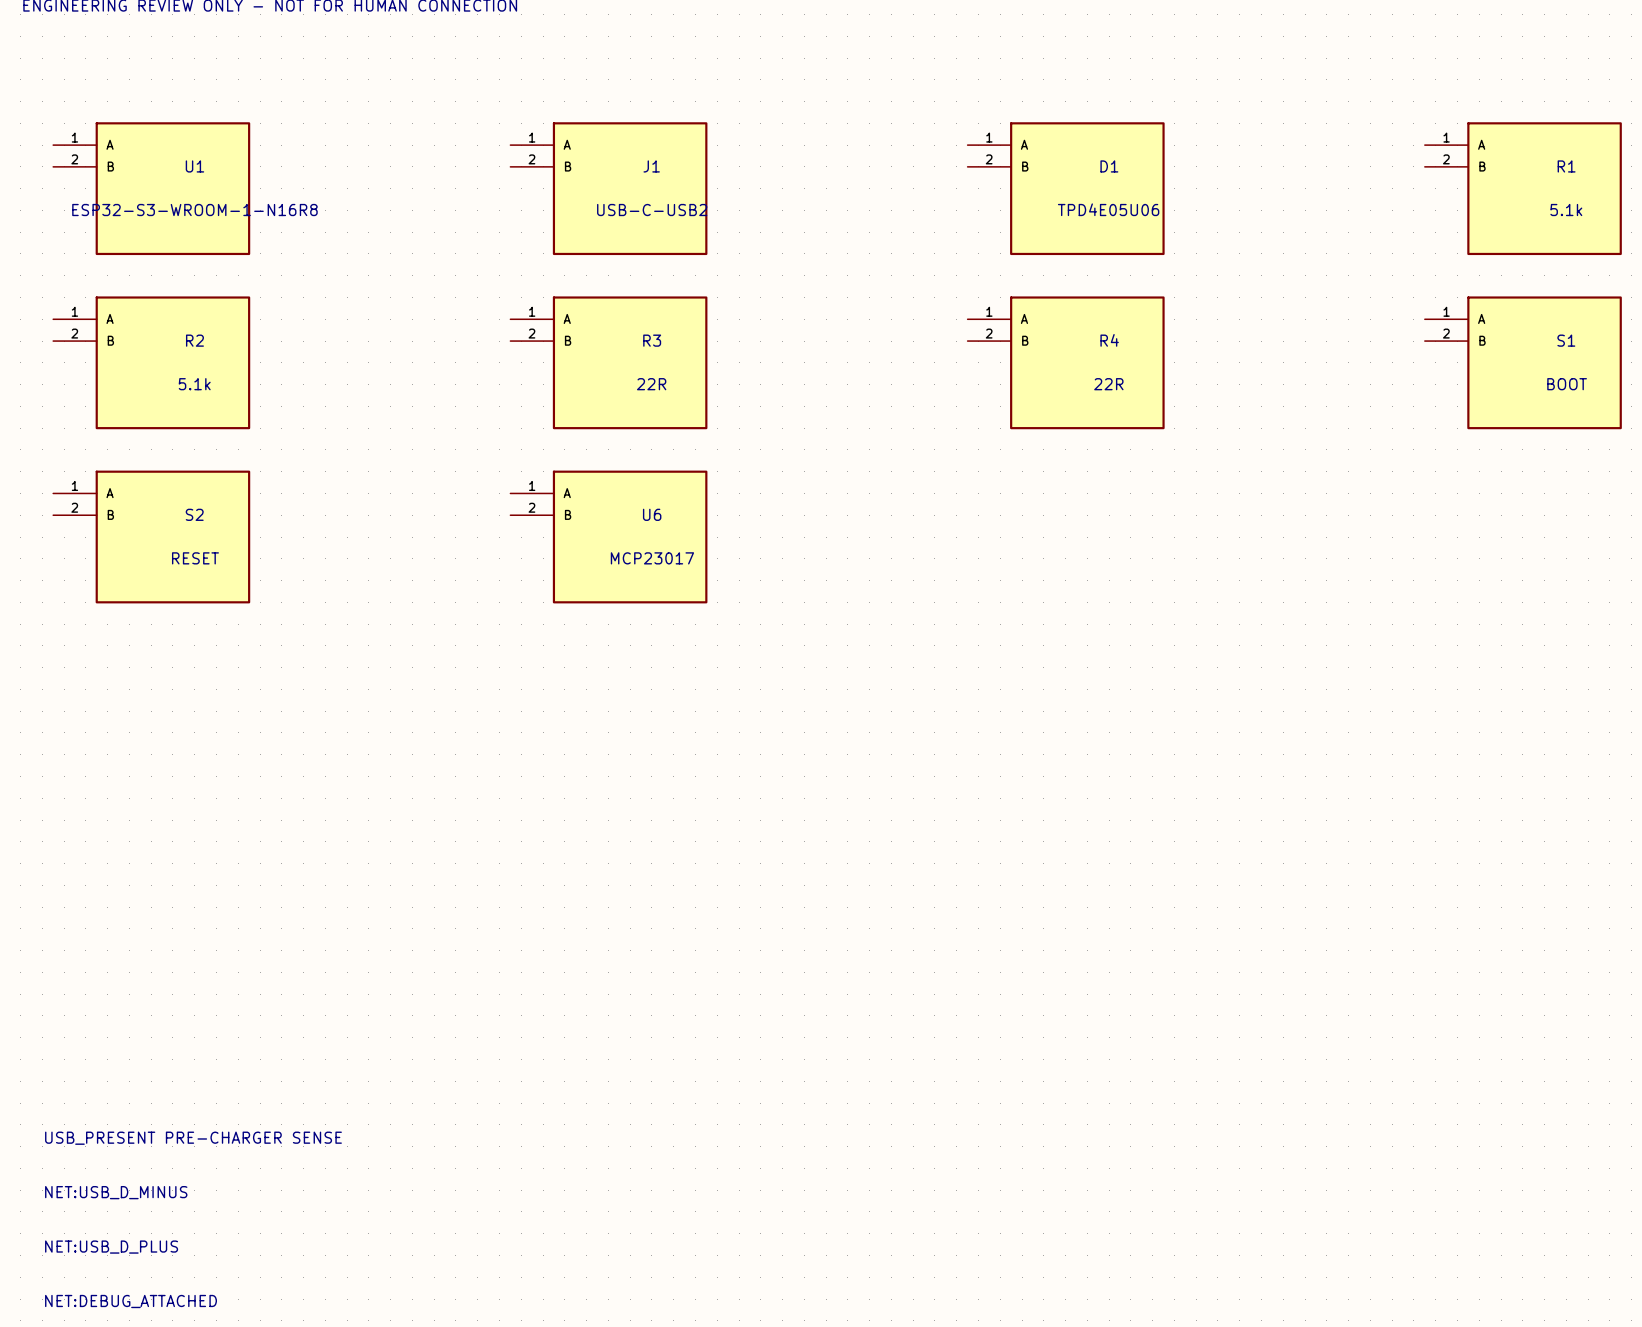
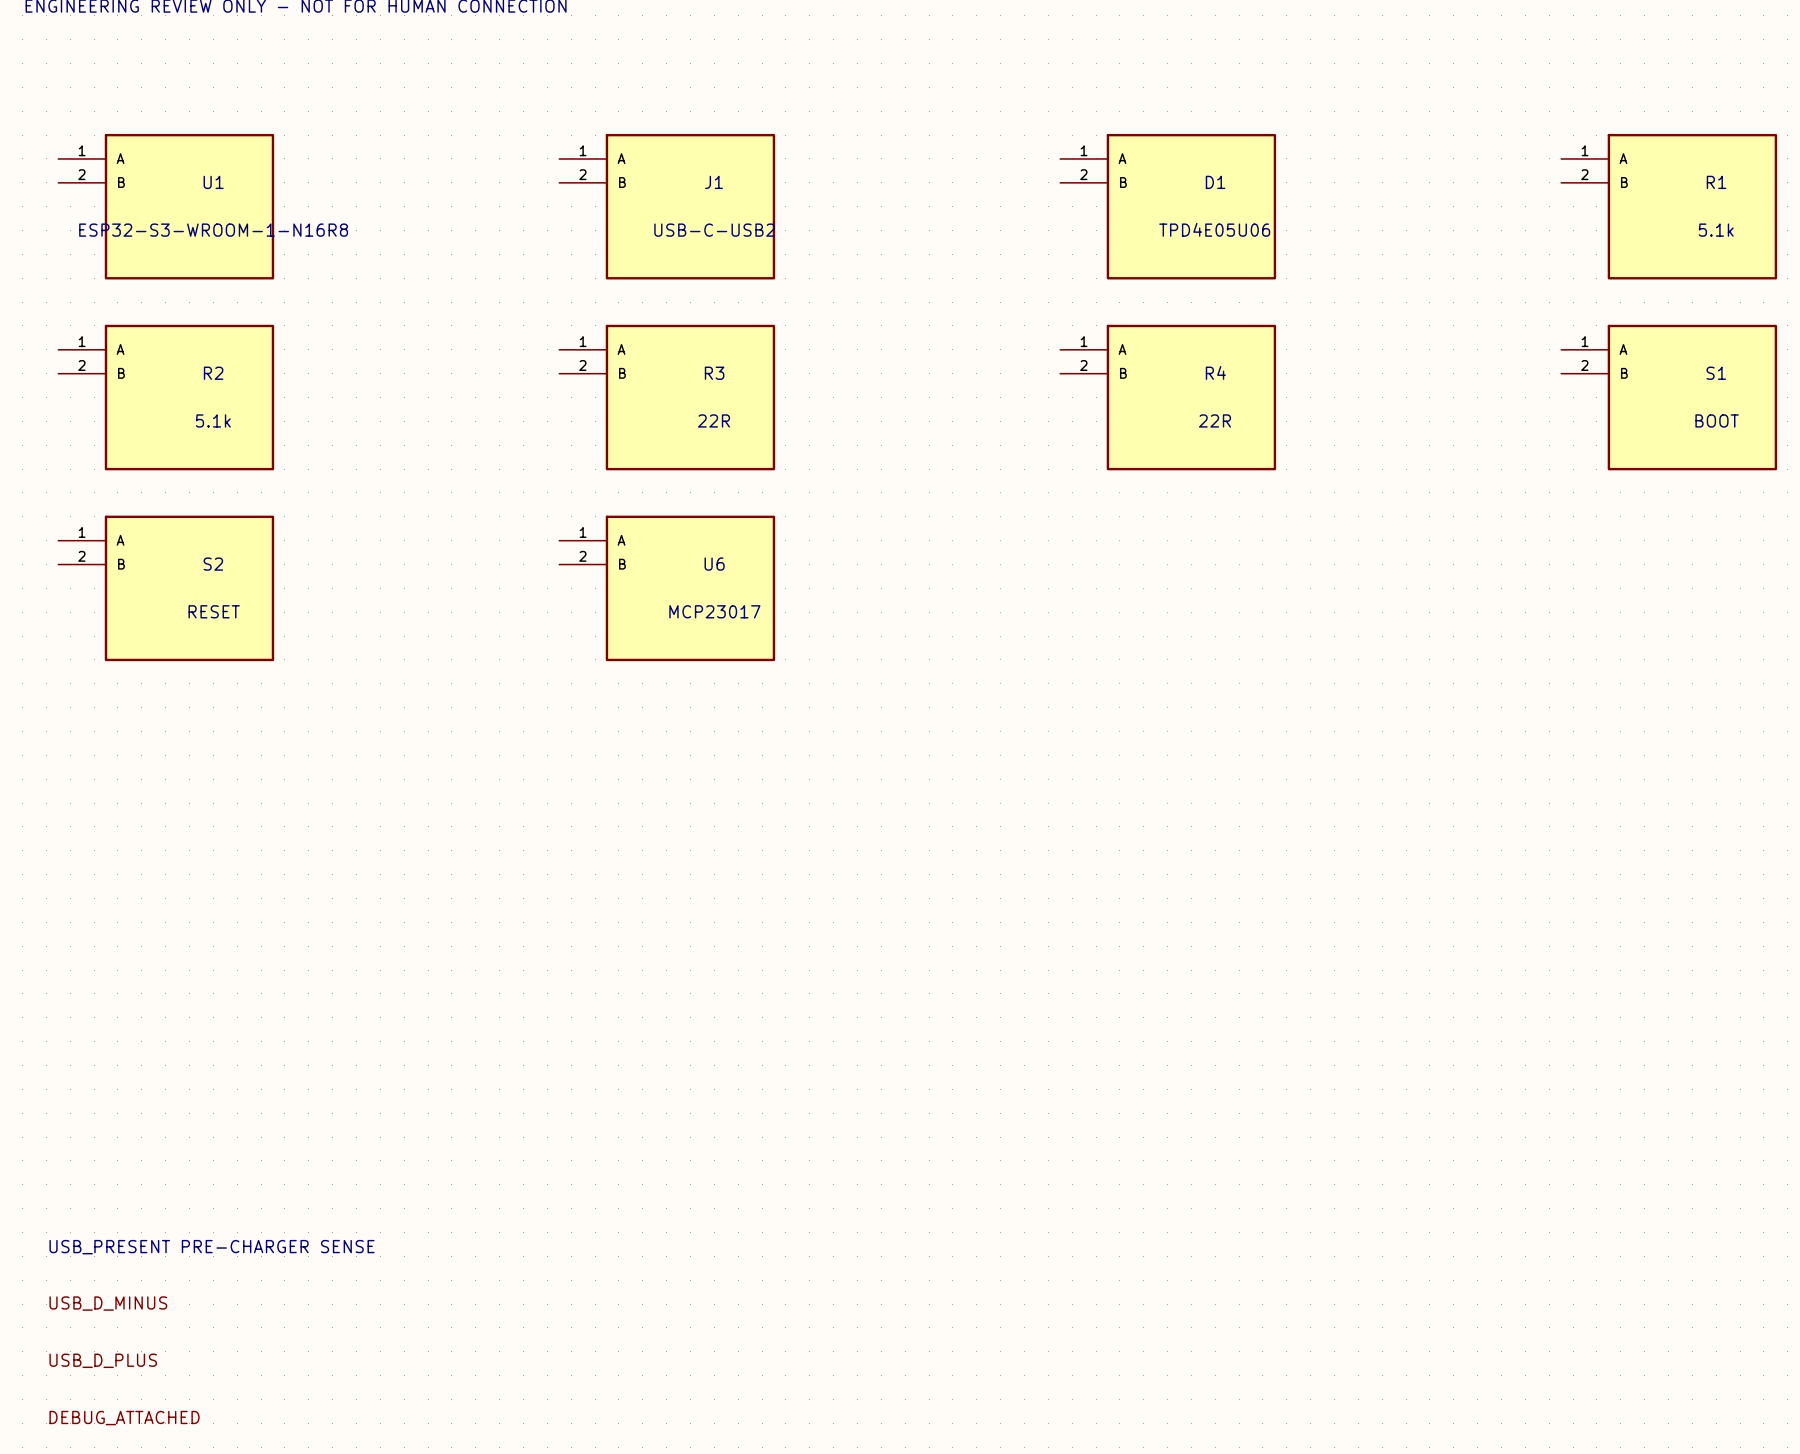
label: none -> USB_D_MINUS (108, 1303)
text: NET:USB_D_MINUS (116, 1192) -> none
label: none -> USB_D_PLUS (103, 1360)
text: NET:USB_D_PLUS (111, 1247) -> none
label: none -> DEBUG_ATTACHED (124, 1418)
text: NET:DEBUG_ATTACHED (131, 1301) -> none

